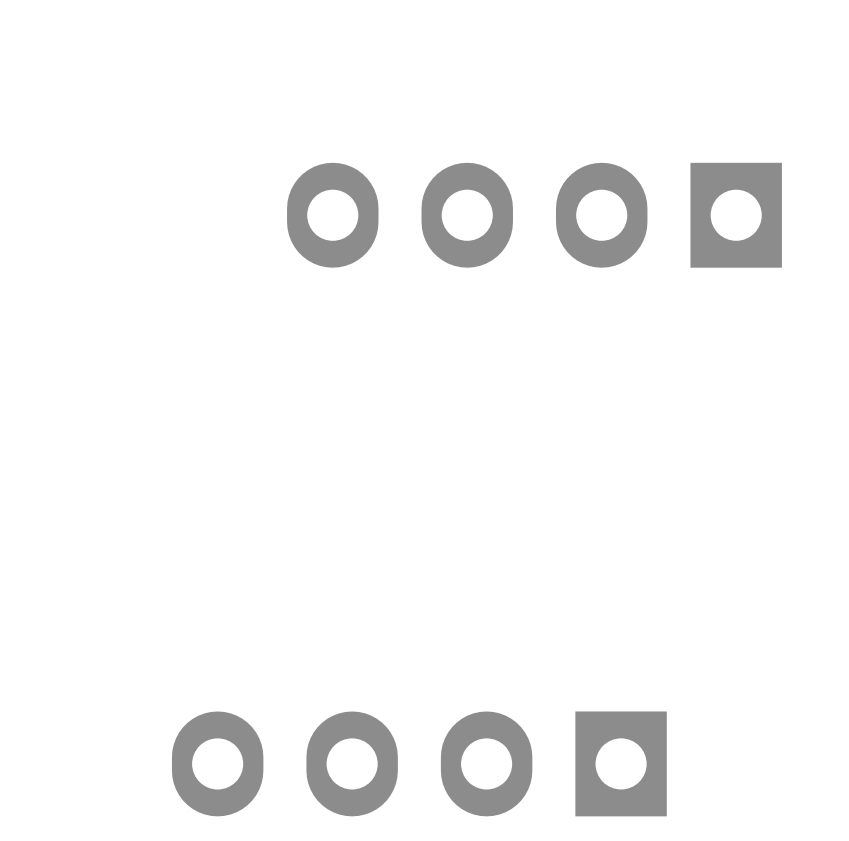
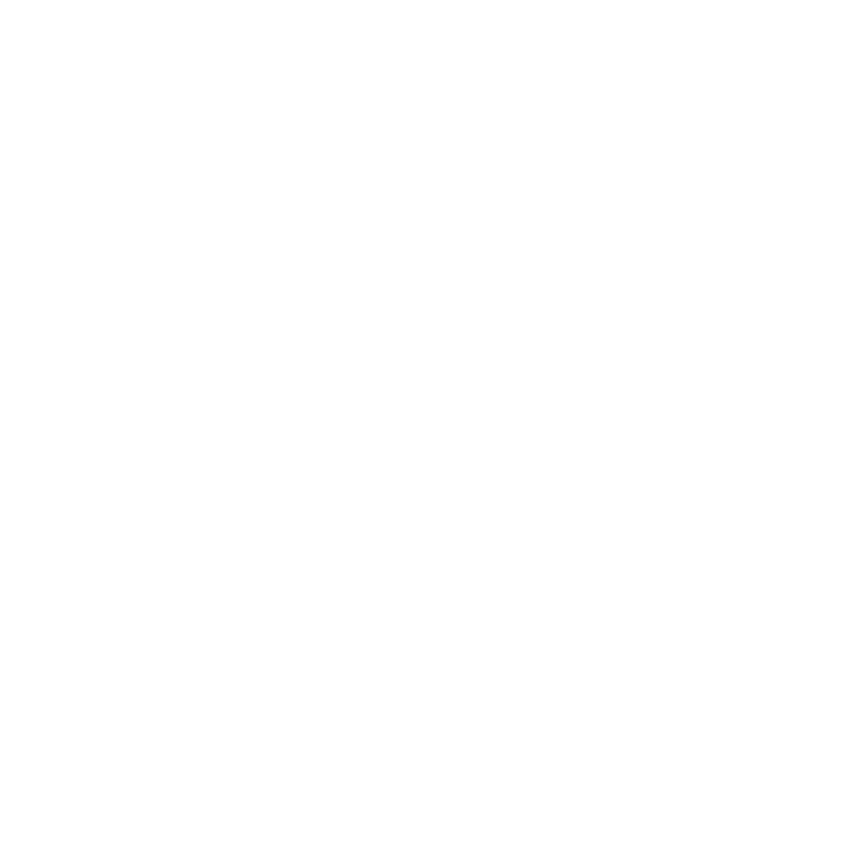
part: (534, 215) -> none
part: (419, 763) -> none

